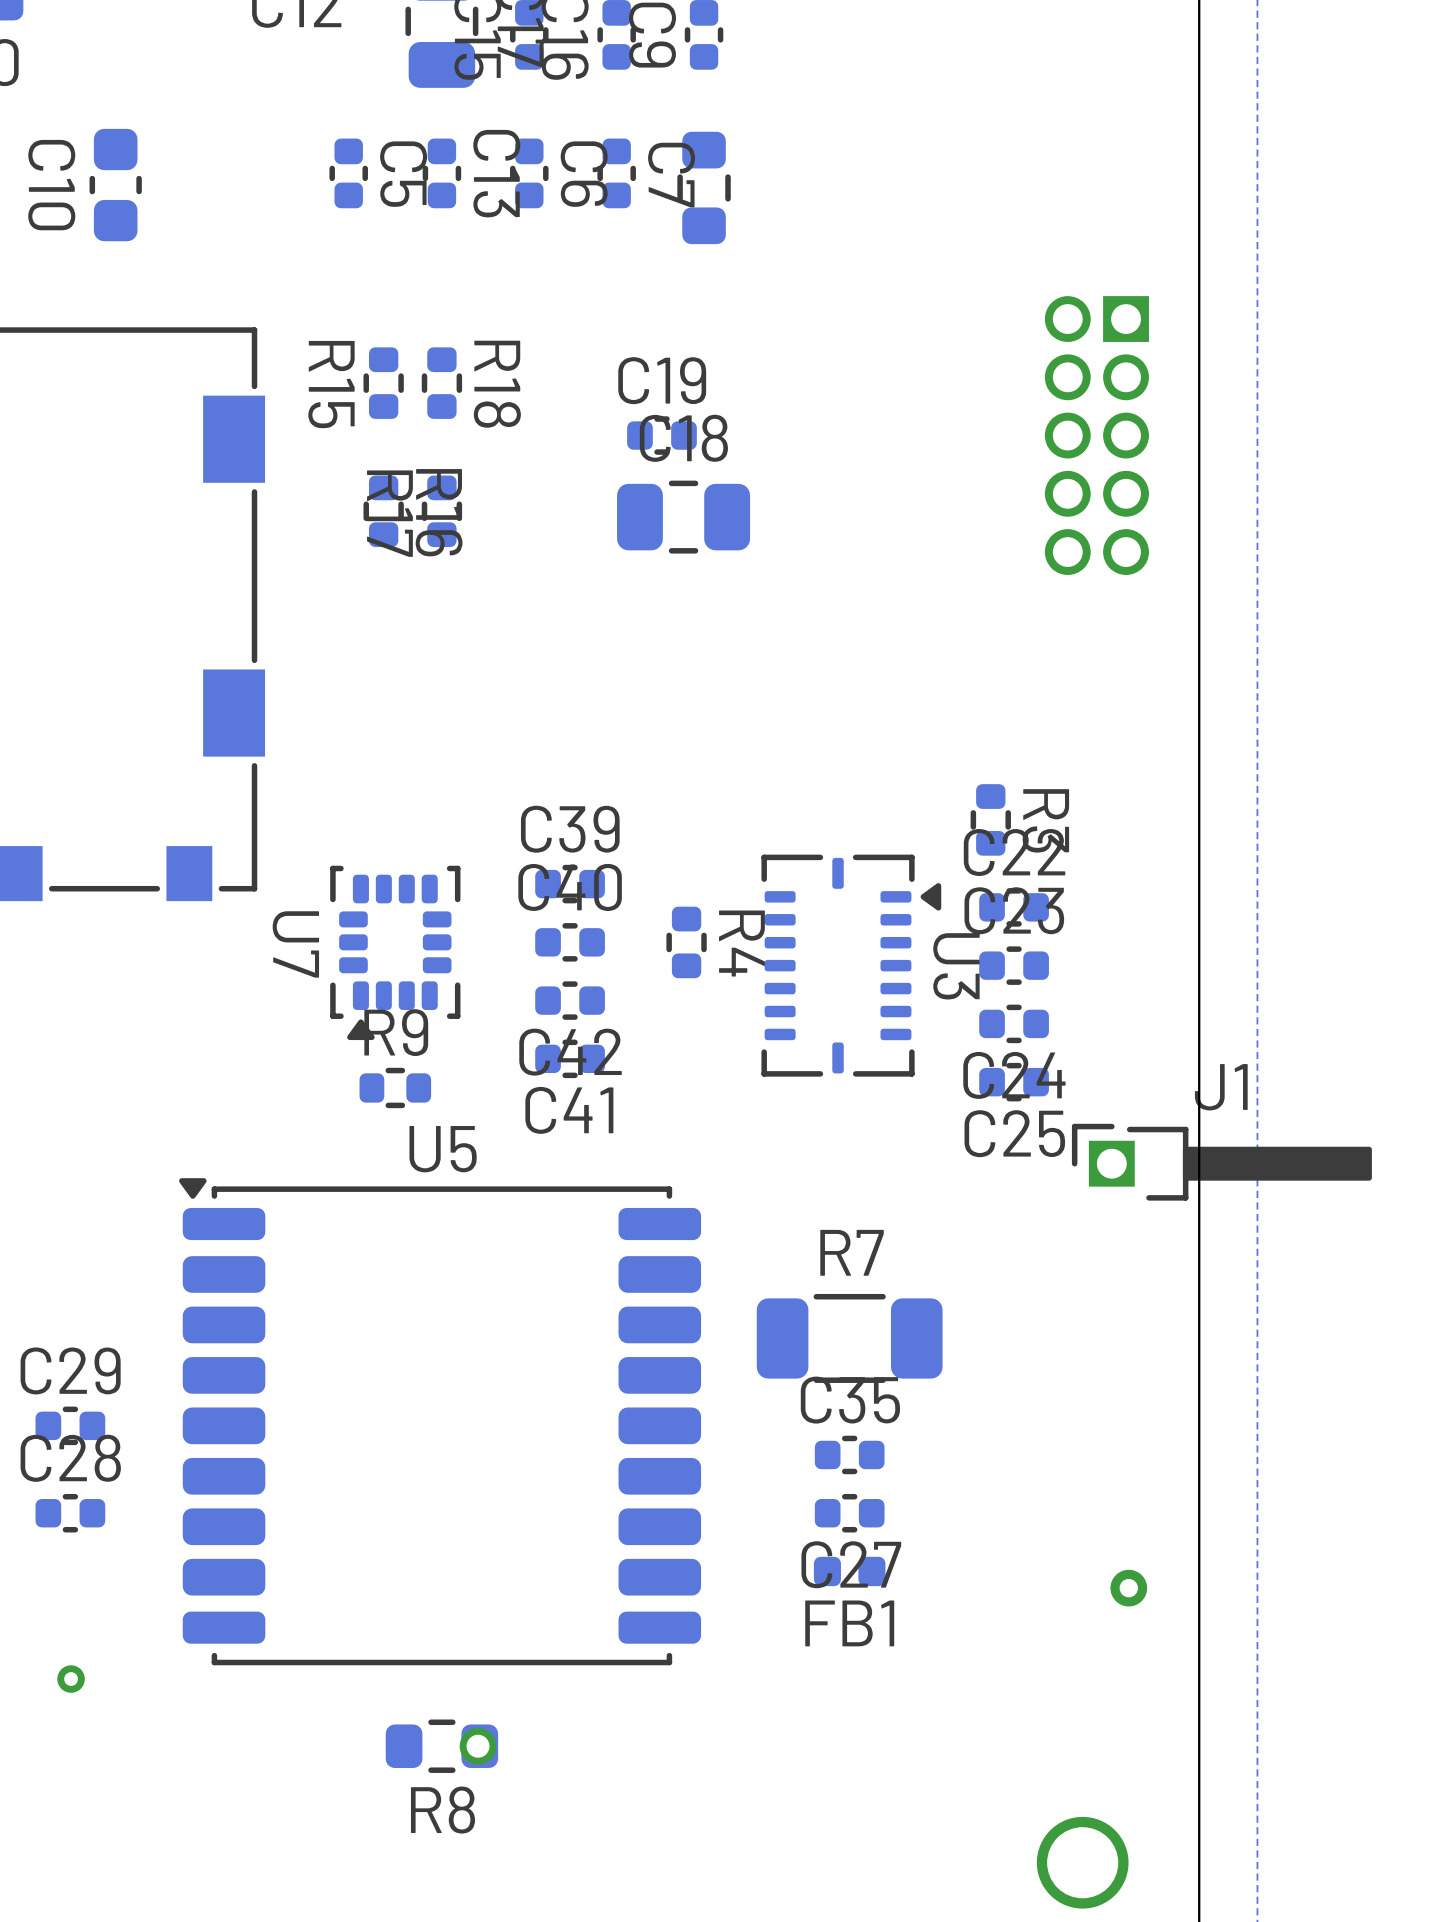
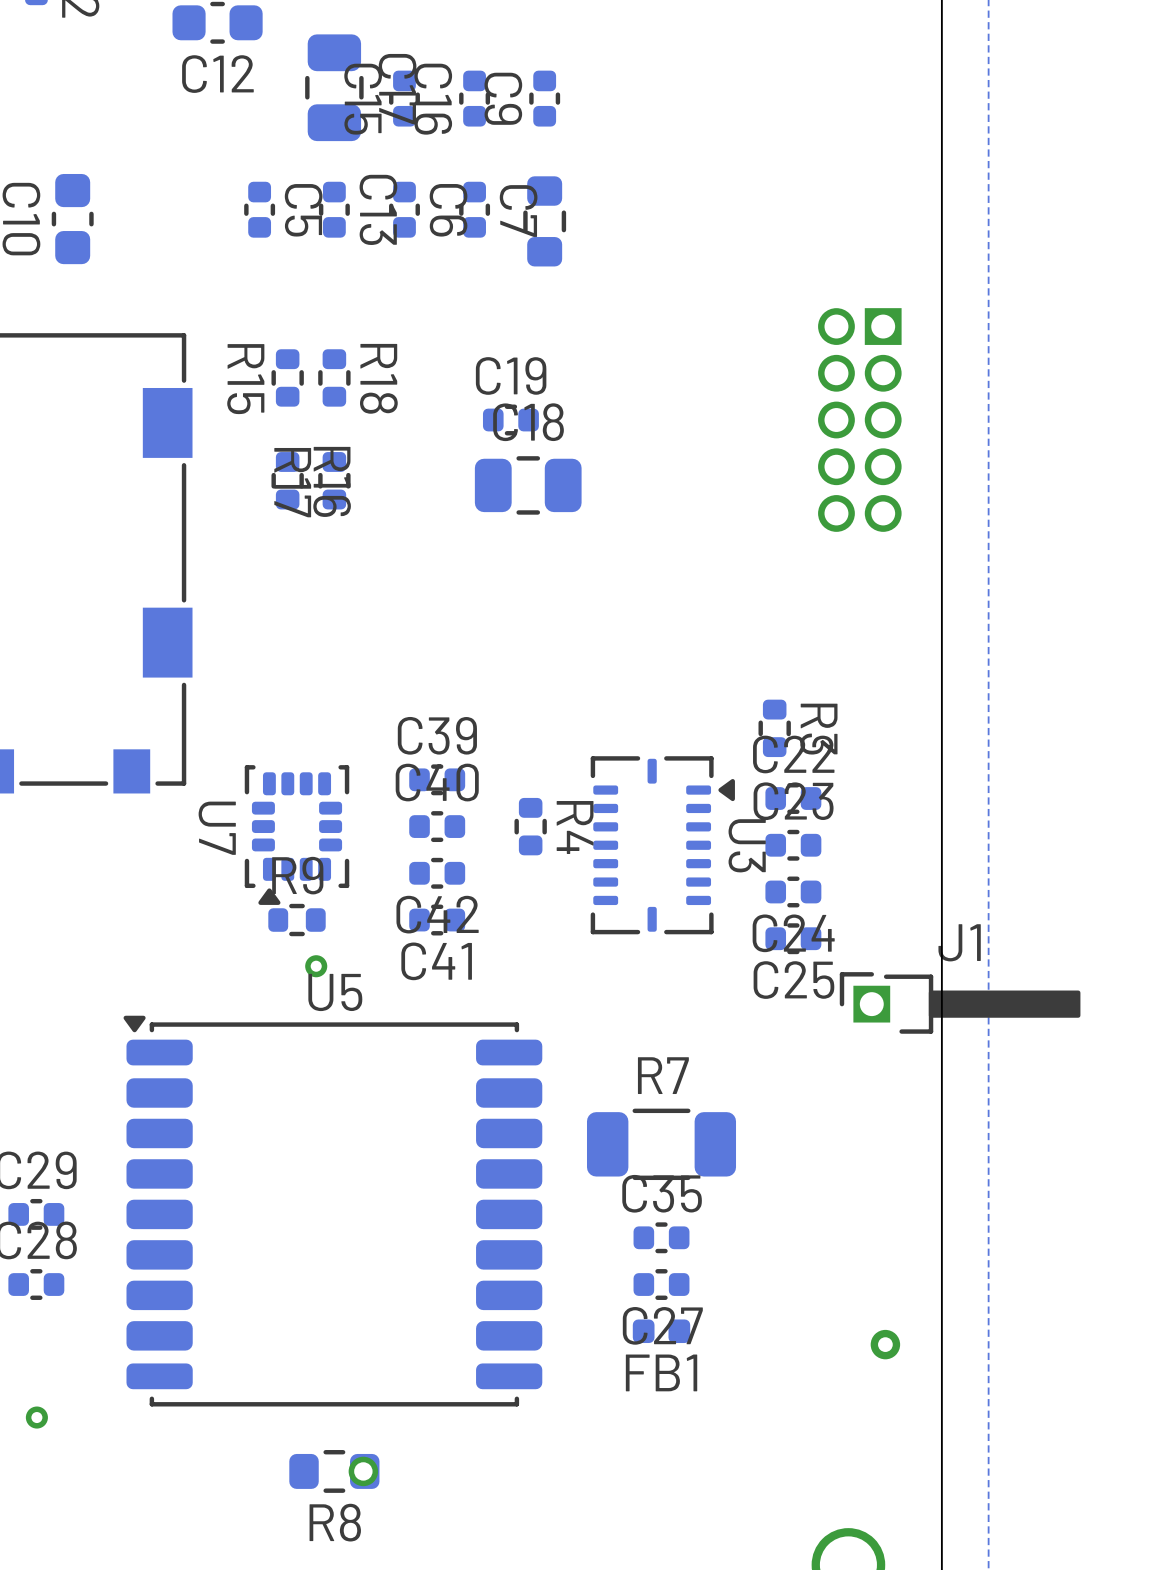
R9 position: (395, 1087) -> (297, 920)
via: none -> (316, 966)

